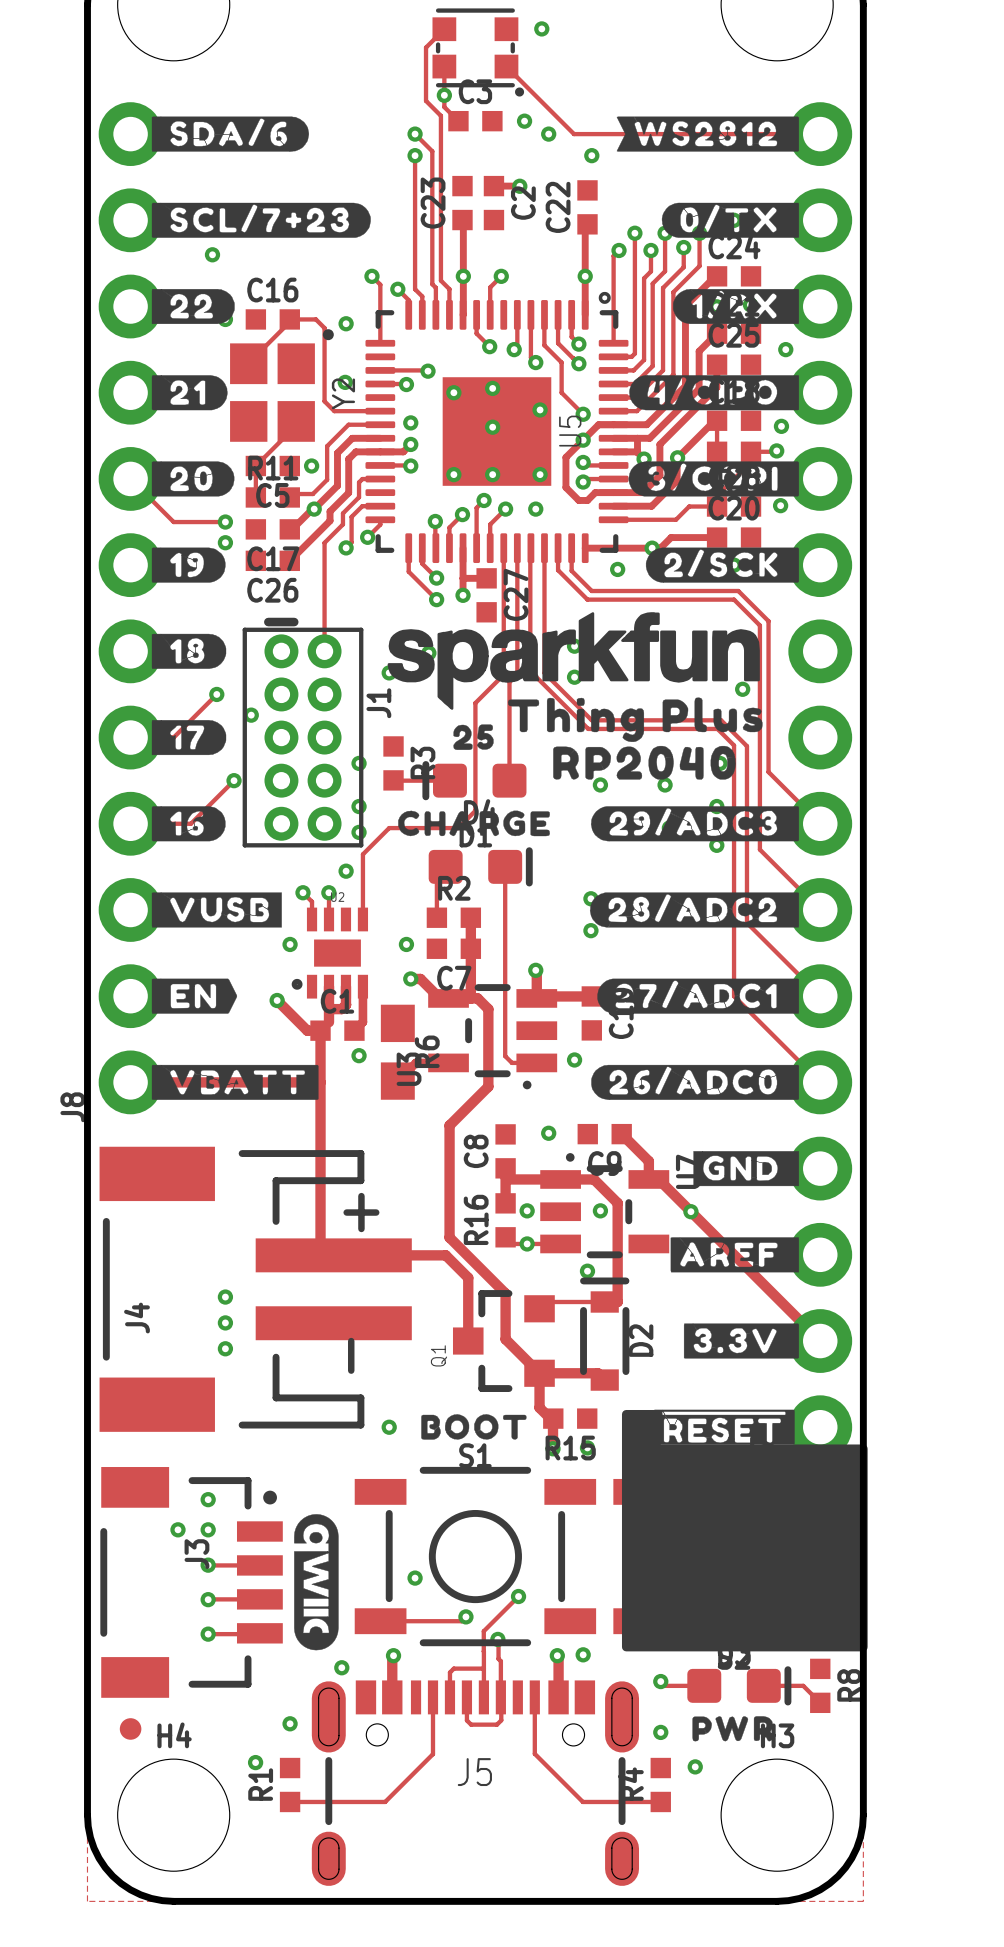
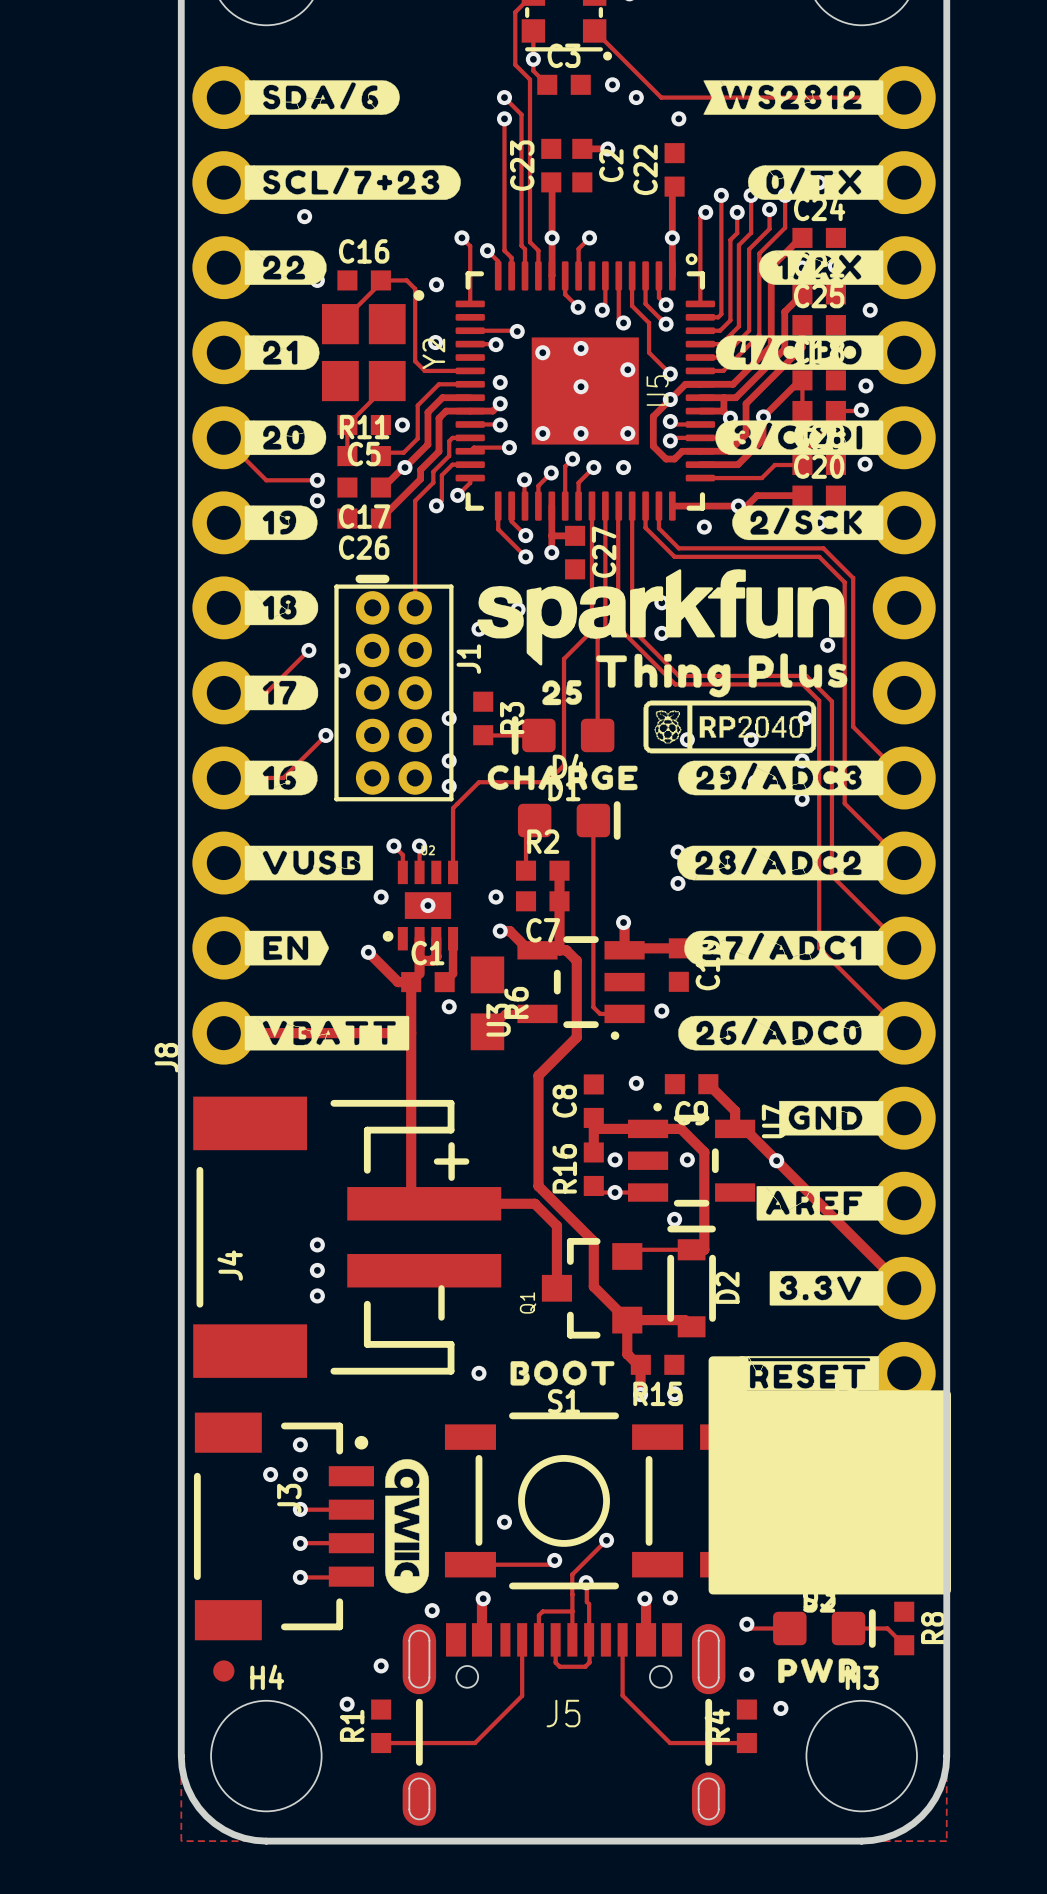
track: none -> (509, 447) (473, 447) (470, 451)
via: none -> (509, 447)
drawing shape: [553, 745, 736, 780] -> [643, 700, 817, 754]
via position: (346, 871) -> (427, 905)

